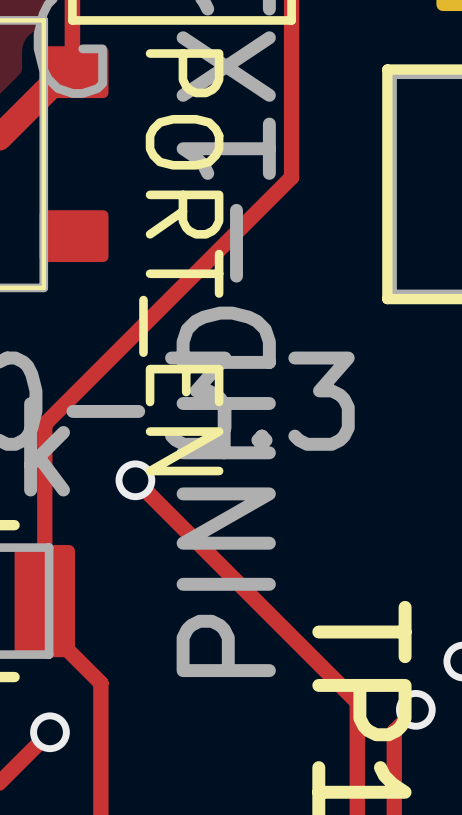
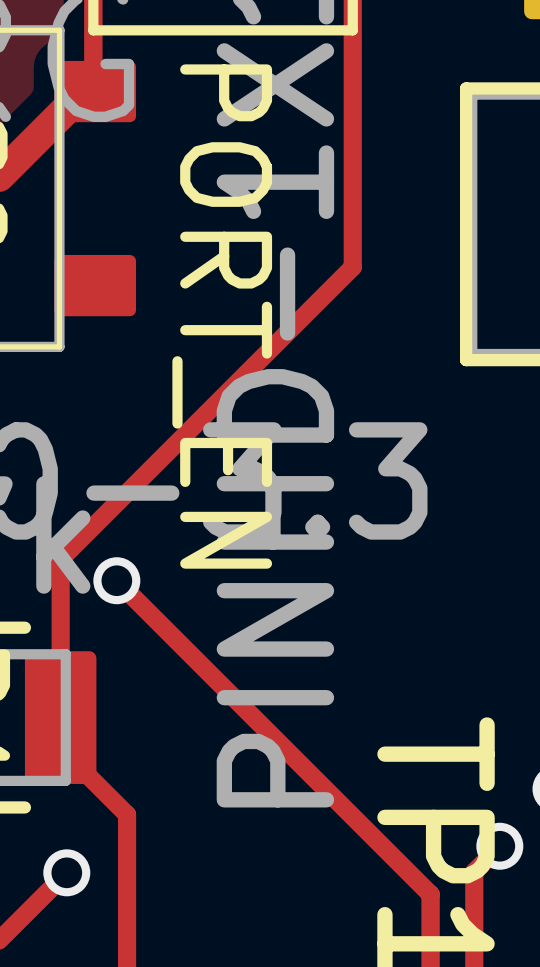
track: (291, 177) (44, 424) (44, 467) -> (352, 216) (352, 267) (60, 559)
track: (135, 480) (357, 702) (357, 750) -> (116, 580) (430, 894)
via position: (135, 480) -> (116, 580)

